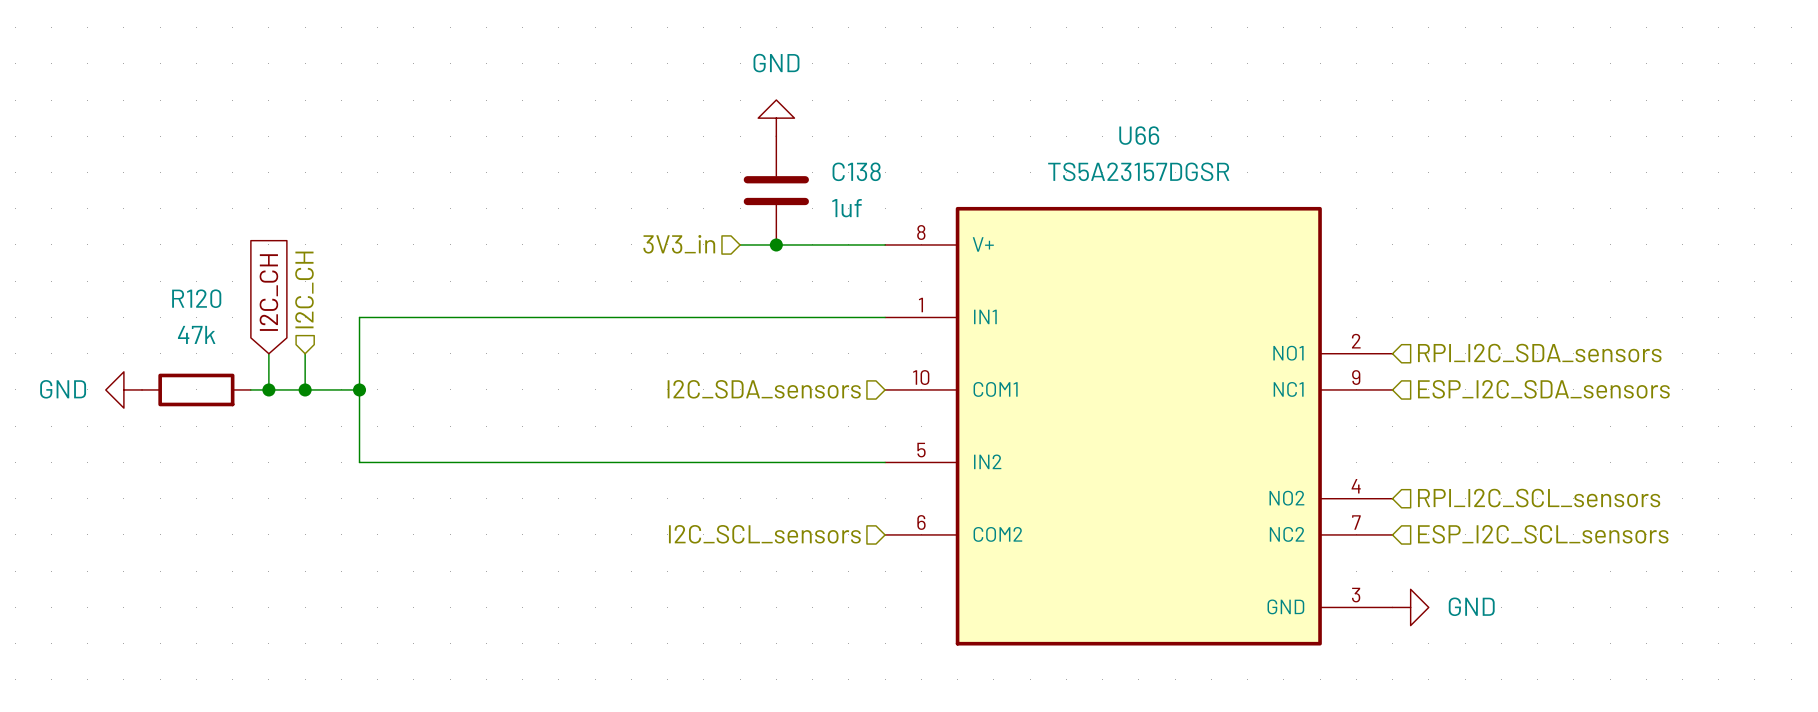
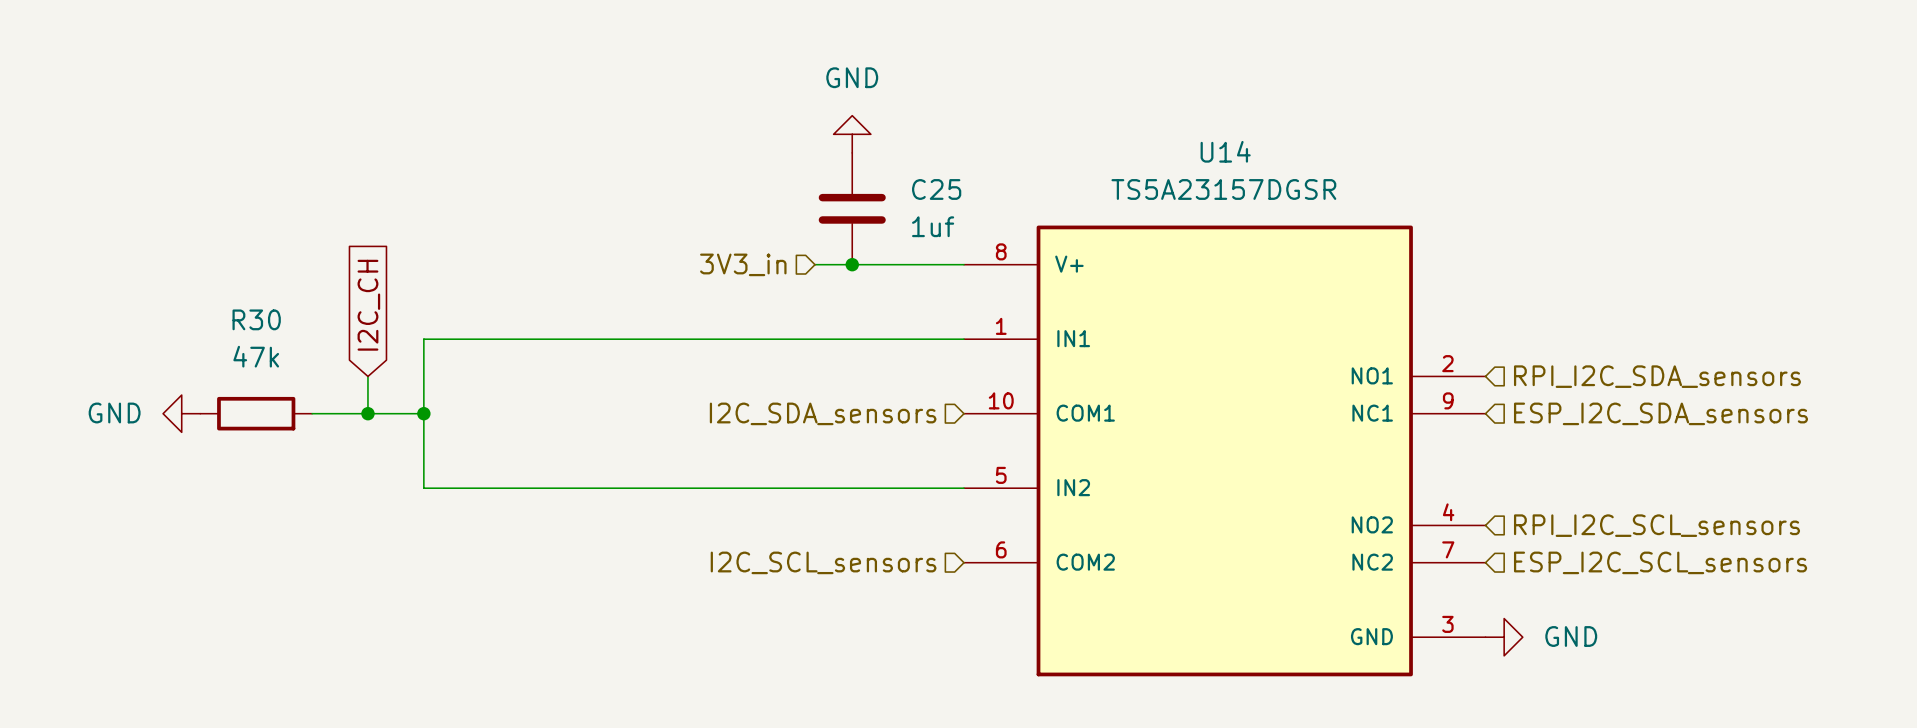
U66 name: U66 (1139, 135) -> U14 (1225, 151)
C138 name: C138 (856, 171) -> C25 (936, 189)
hierarchical label: I2C_CH (304, 289) -> none
global label position: I2C_CH (268, 292) -> I2C_CH (368, 305)
R120 name: R120 (196, 298) -> R30 (256, 319)
wire: (268, 353) (268, 389) -> none
junction: (268, 389) -> none

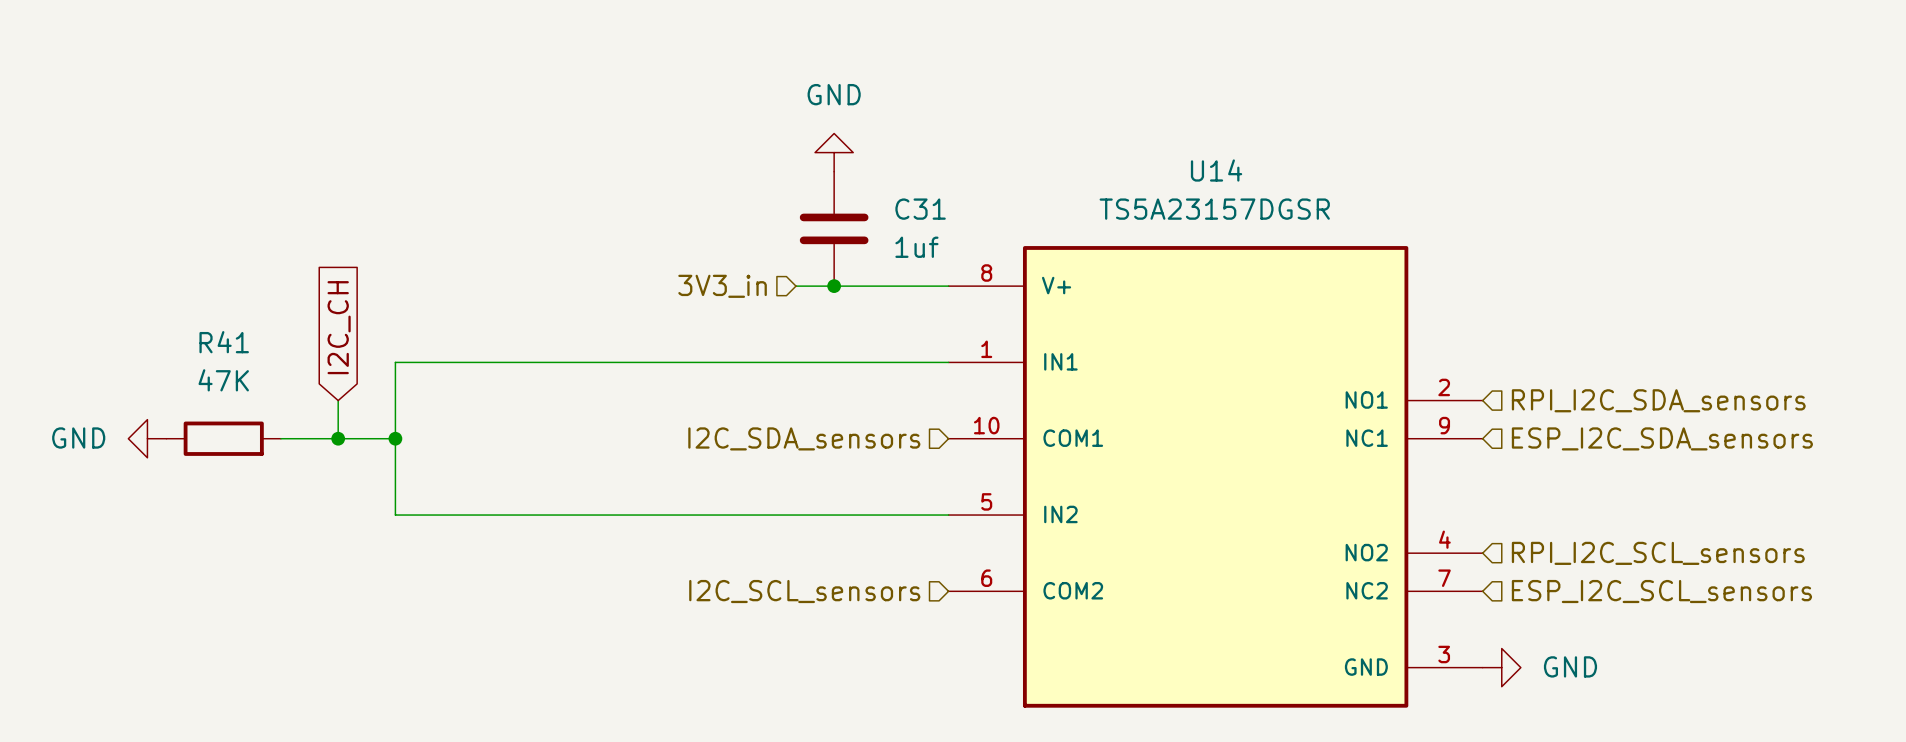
C25 name: C25 (936, 189) -> C31 (920, 209)
R30 name: R30 (256, 319) -> R41 (224, 342)
R30 value: 47k (256, 356) -> 47K (223, 380)

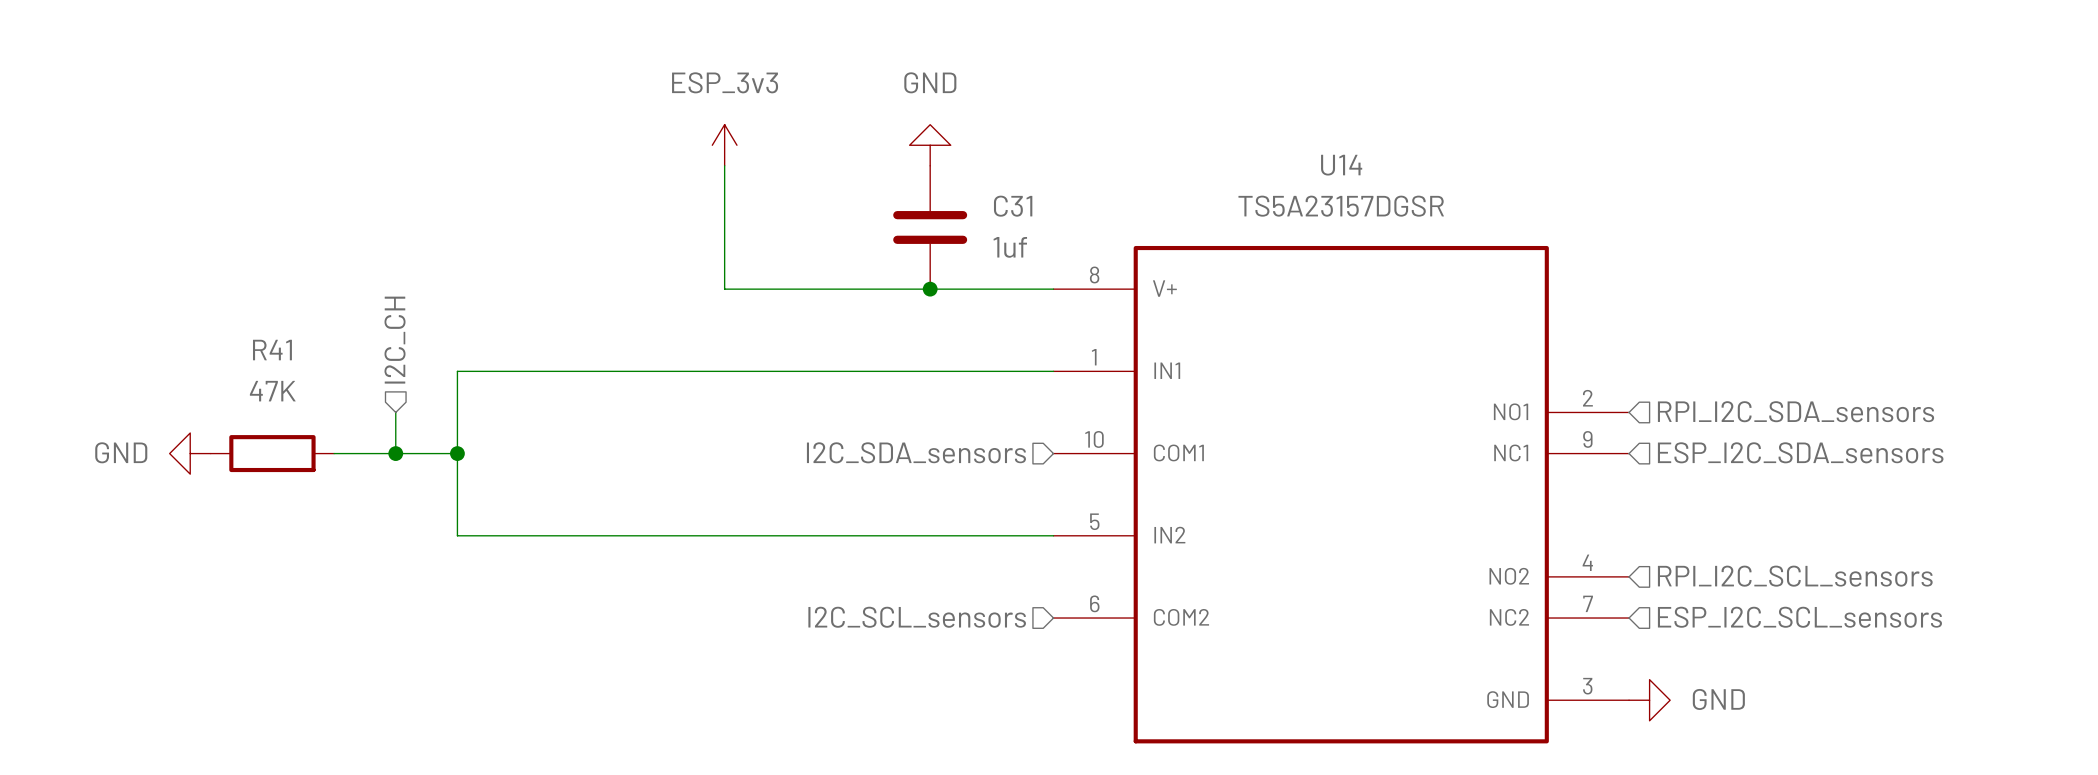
power symbol: none -> ESP_3v3 (724, 145)
wire: none -> (724, 165) (724, 289) (889, 289)
hierarchical label: 3V3_in (722, 286) -> none
hierarchical label: none -> I2C_CH (395, 340)
global label: I2C_CH (339, 327) -> none

